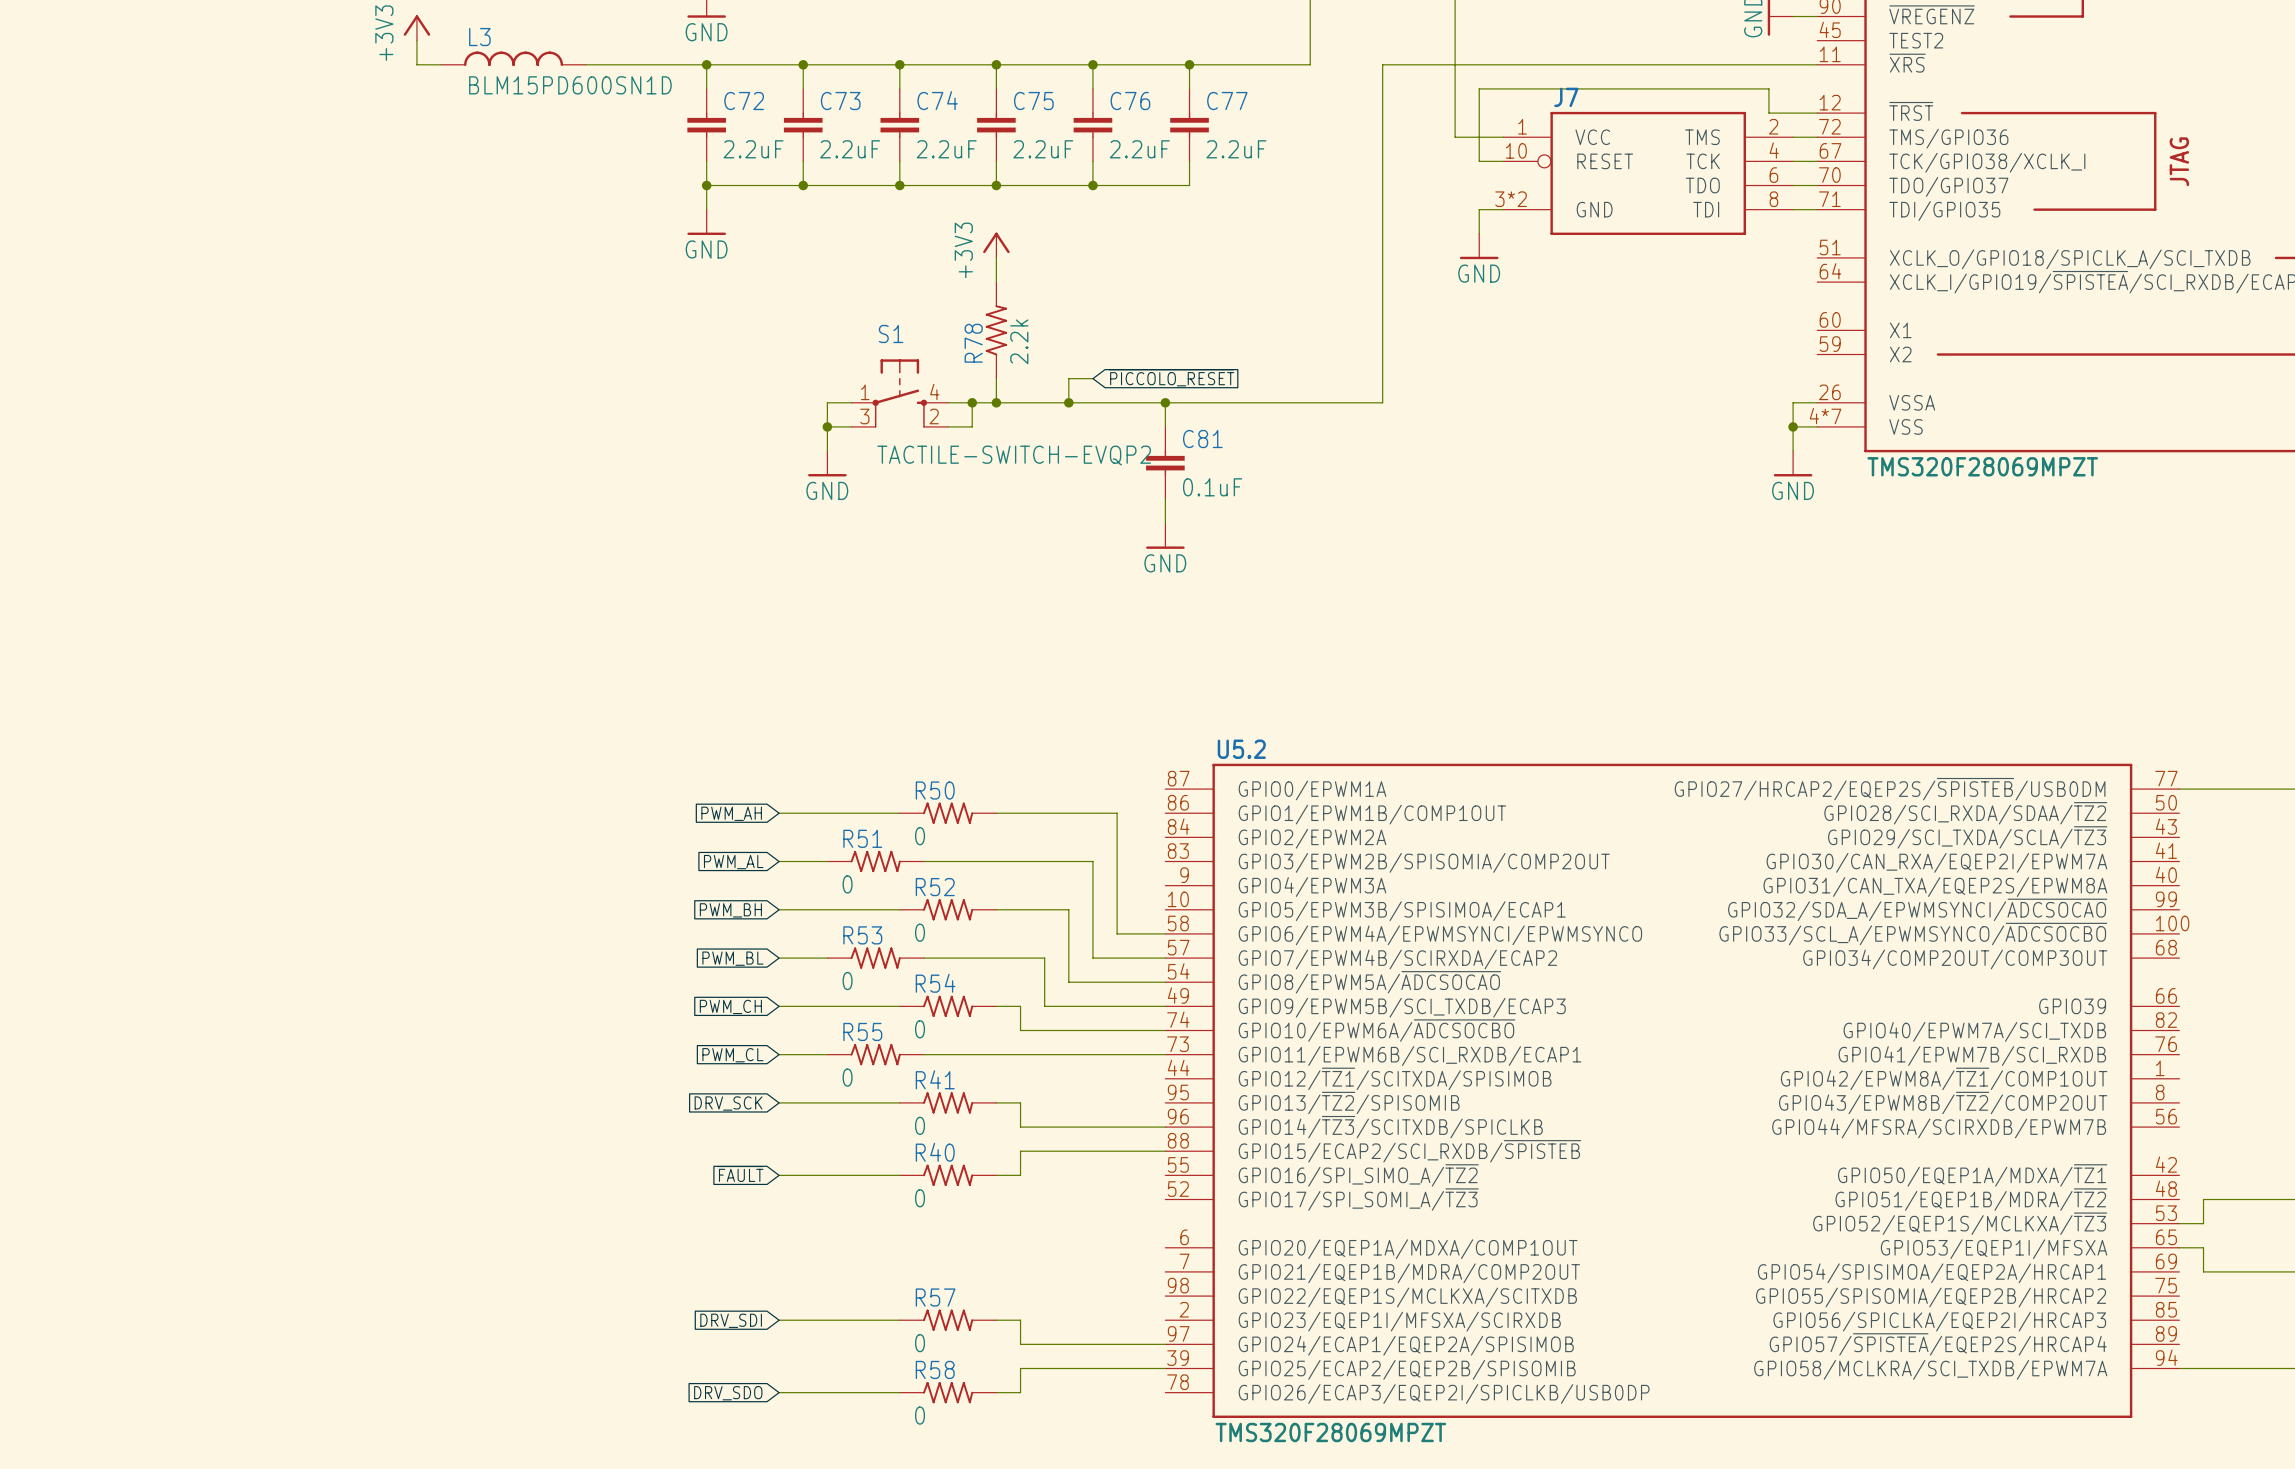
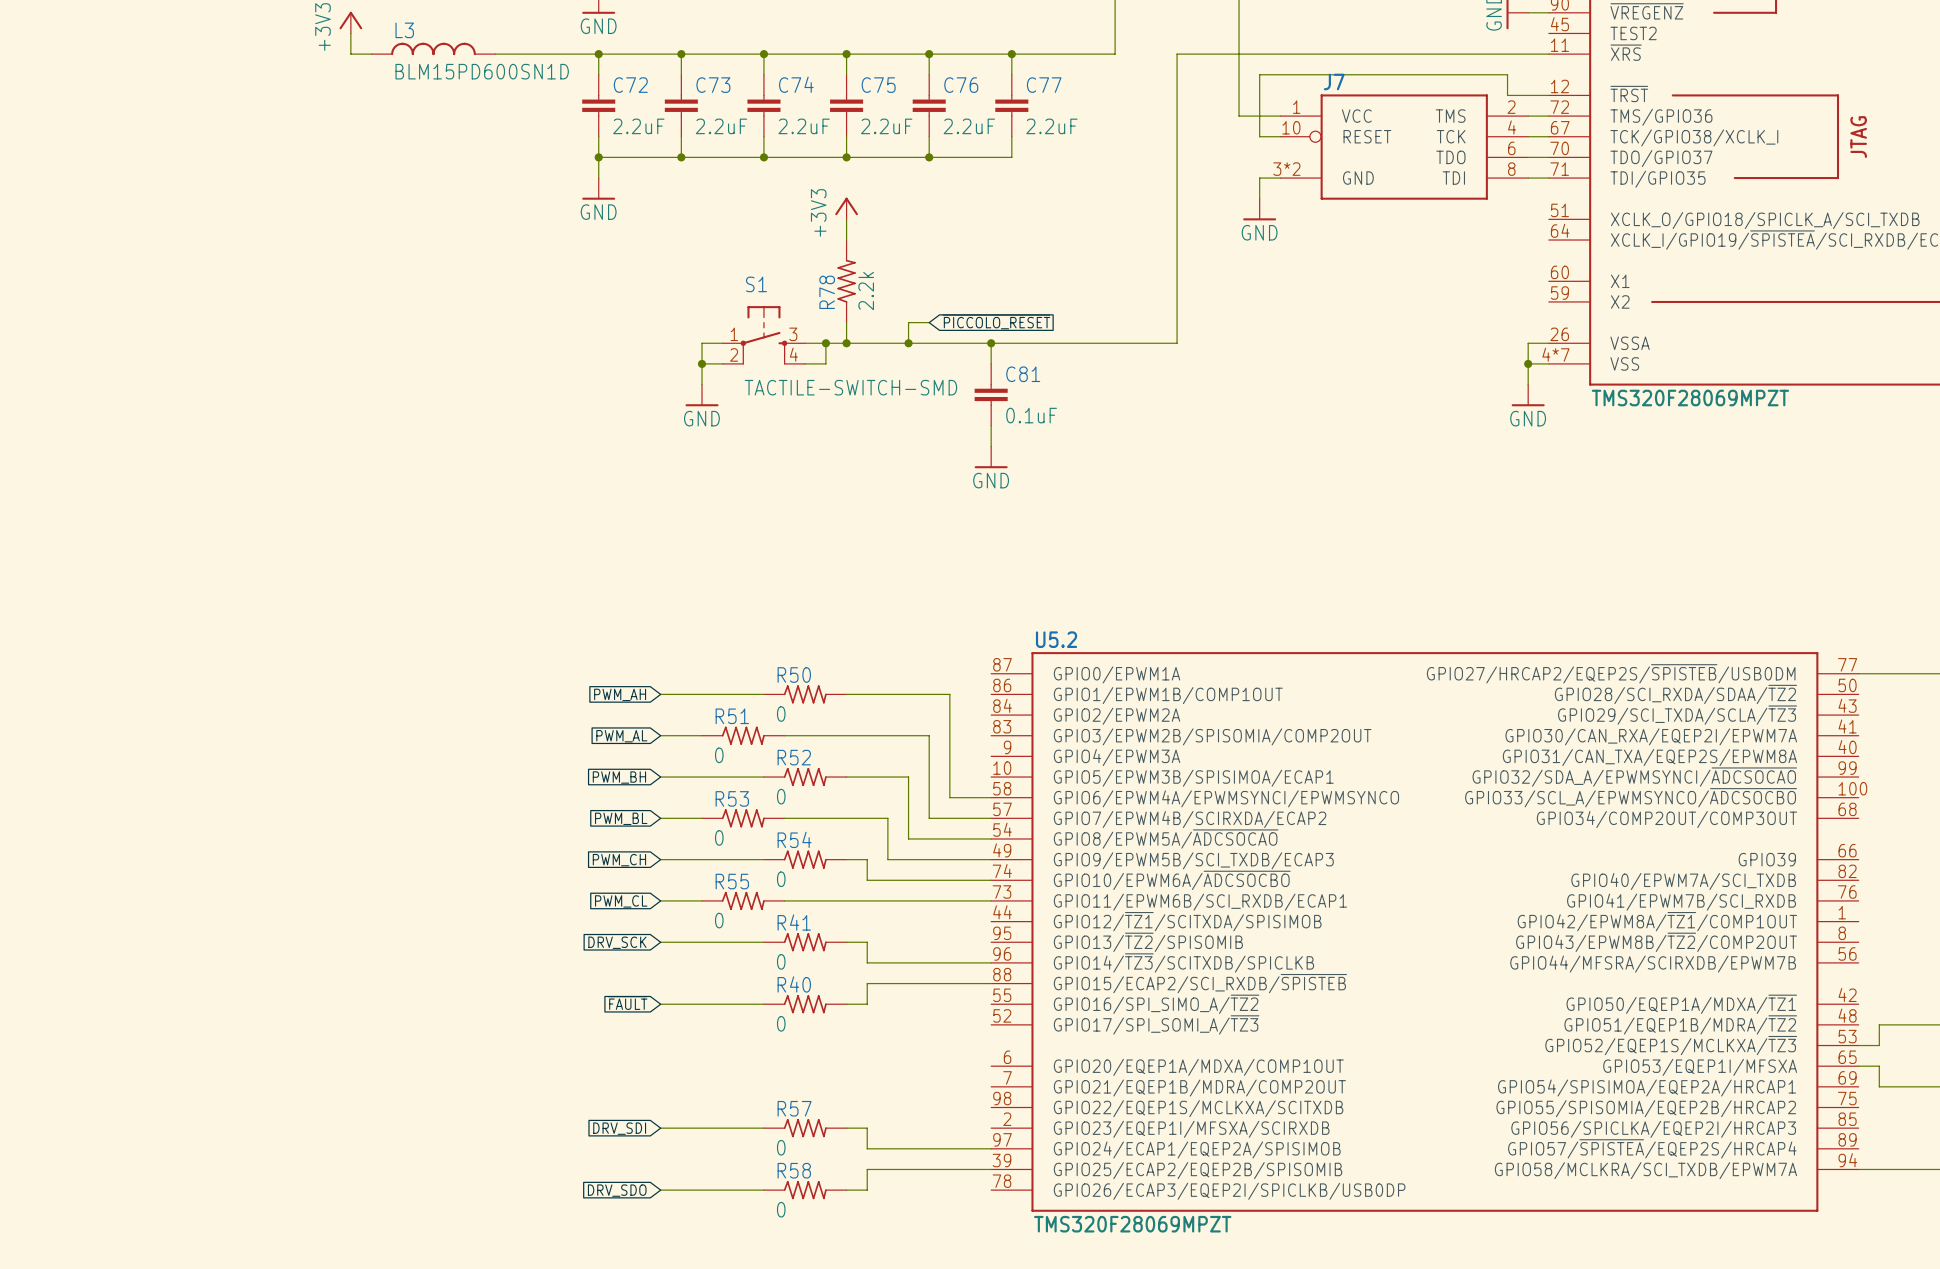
S1 pin number: 4 (934, 392) -> 3 (793, 334)
S1 pin number: 3 (864, 416) -> 2 (734, 354)
S1 pin number: 2 (934, 416) -> 4 (793, 354)
S1 value: TACTILE-SWITCH-EVQP2 (1014, 455) -> TACTILE-SWITCH-SMD (850, 387)

